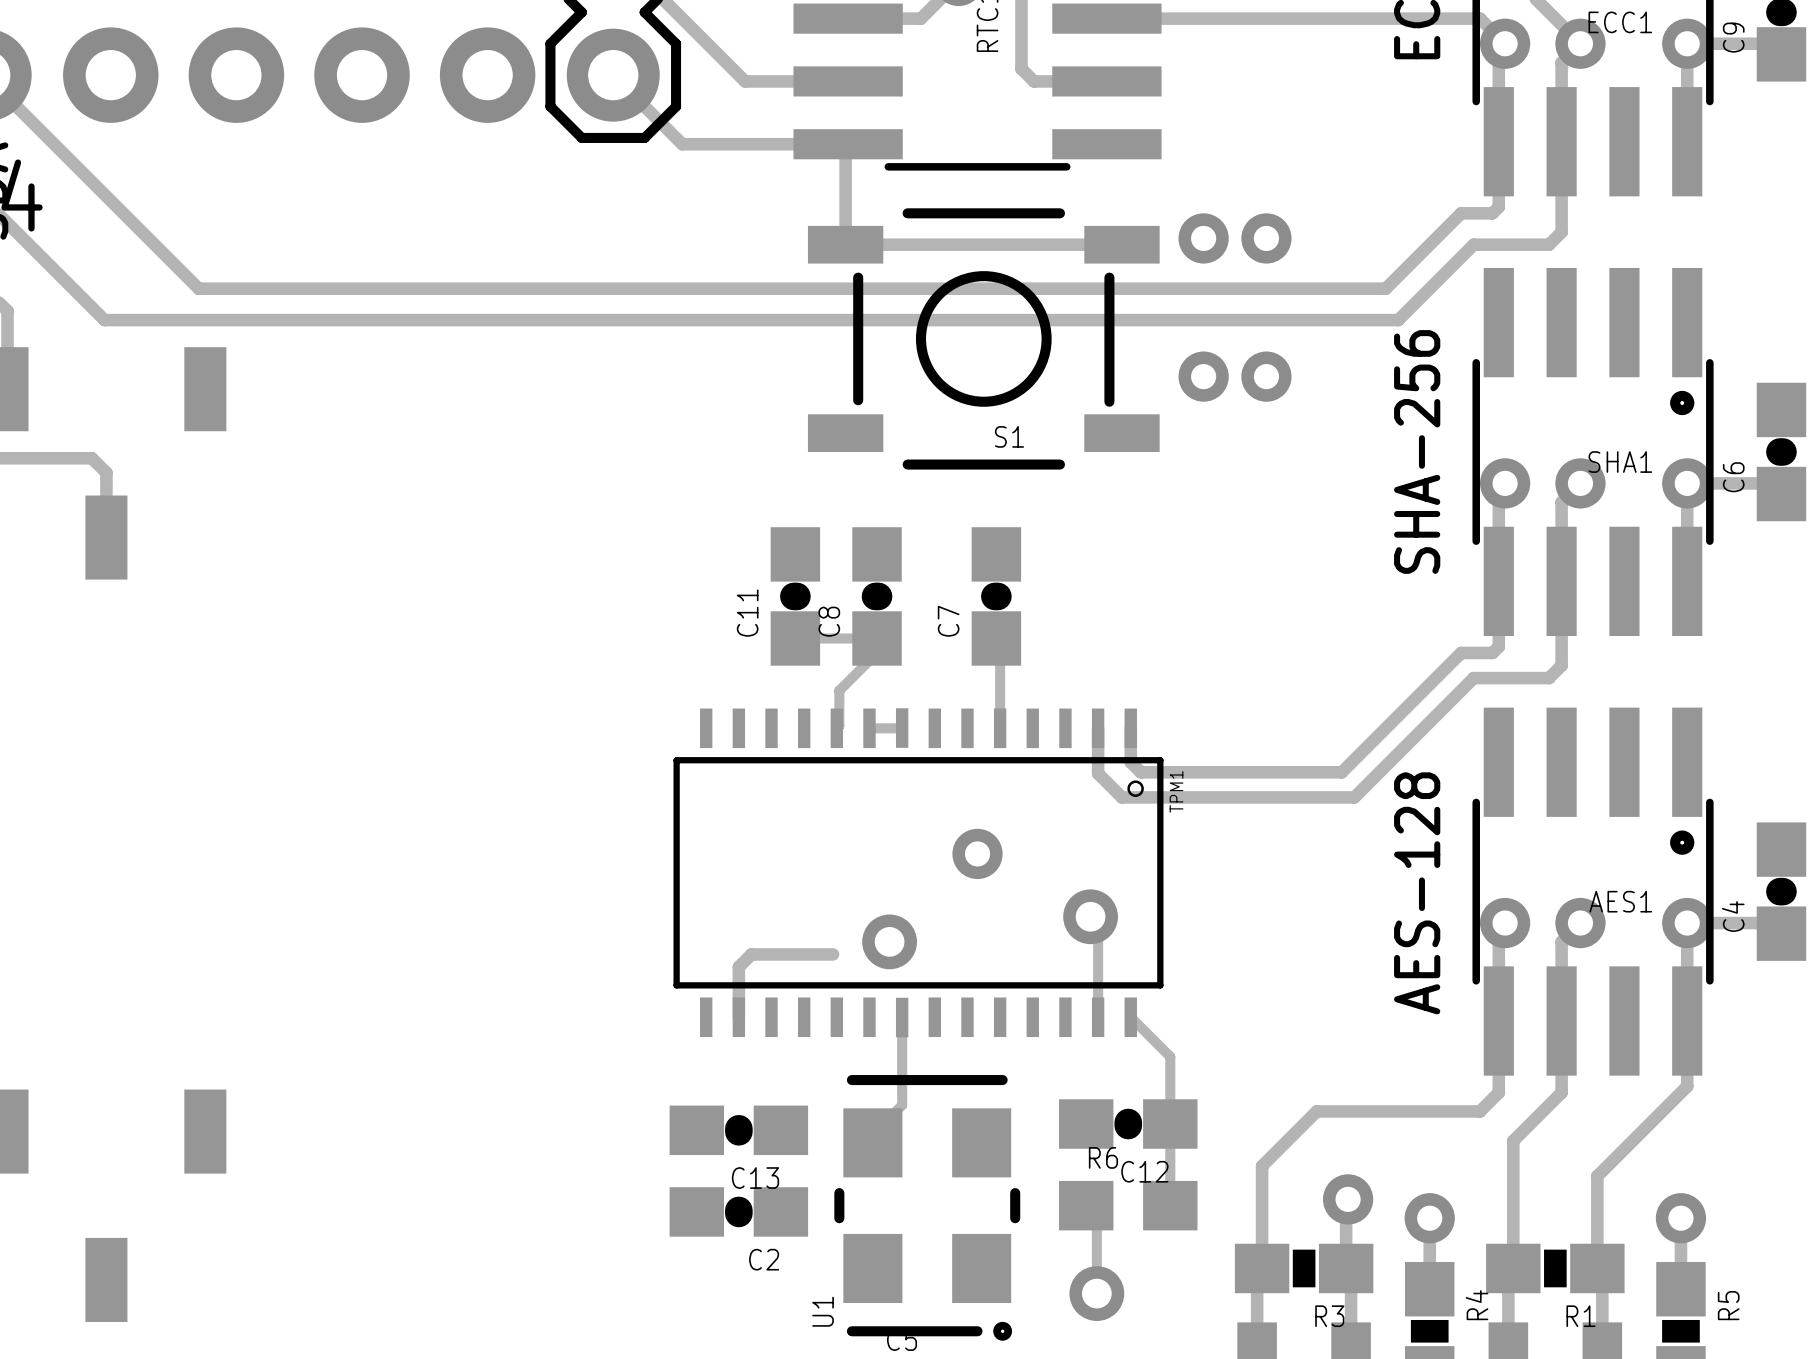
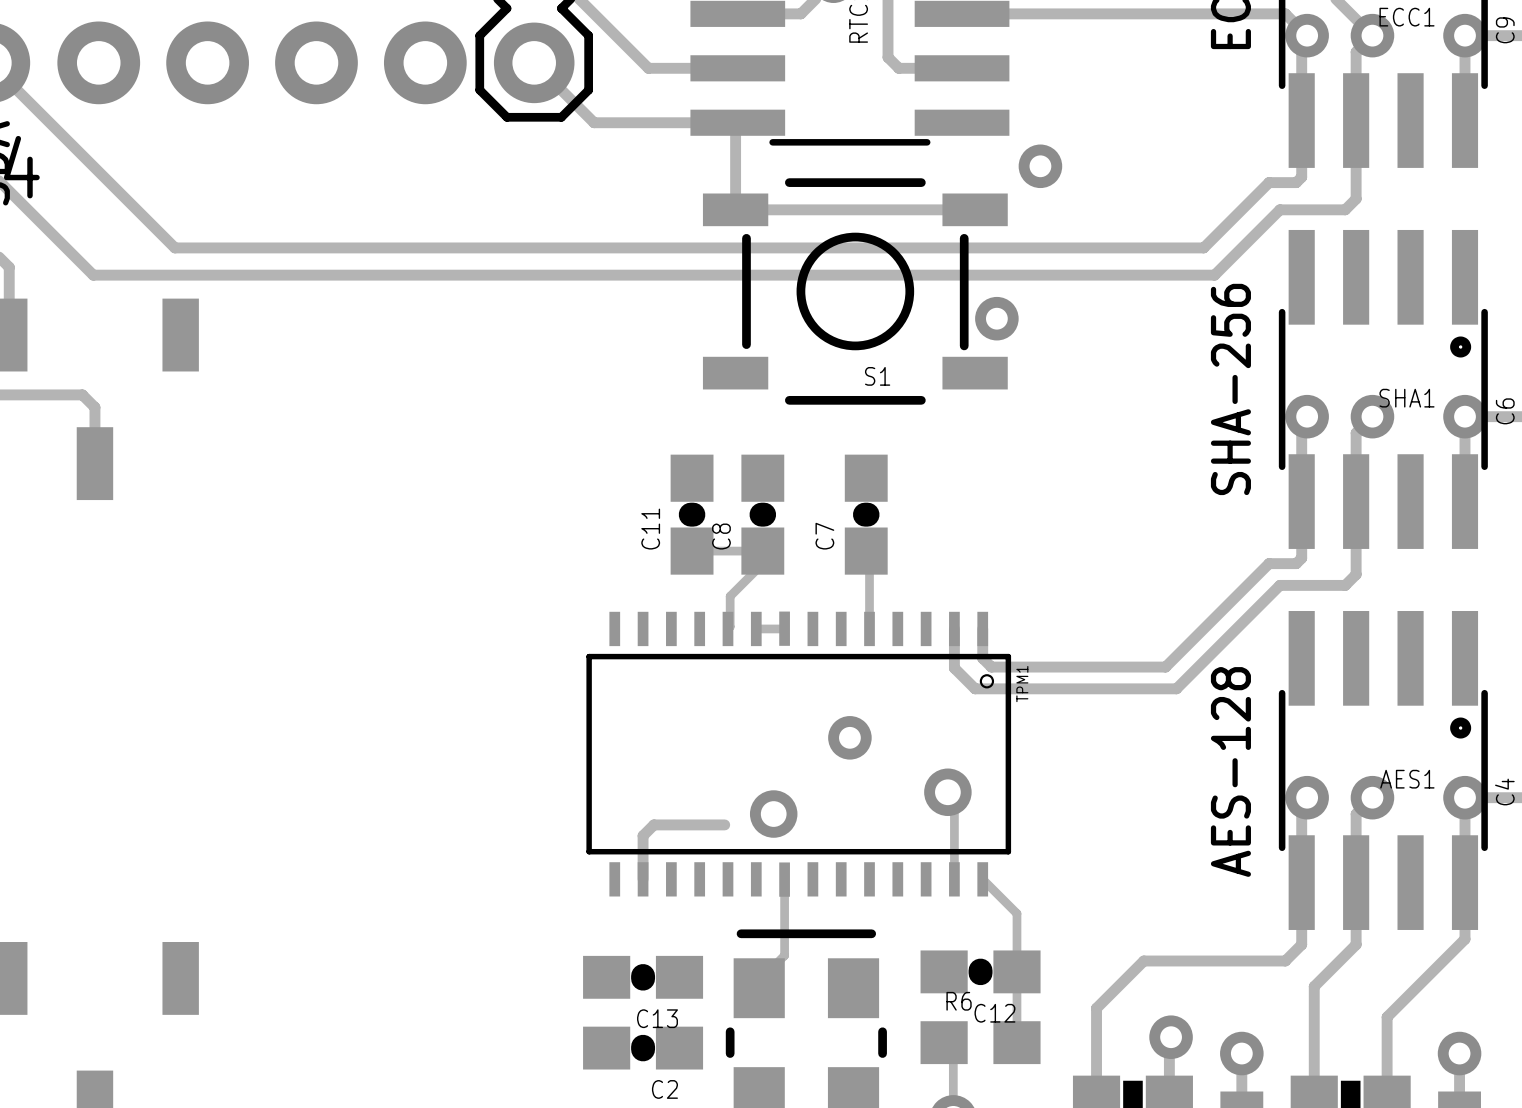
via position: (1203, 238) -> (1040, 166)
via: (1266, 238) -> none
via position: (1203, 376) -> (996, 318)
via: (1266, 376) -> none

